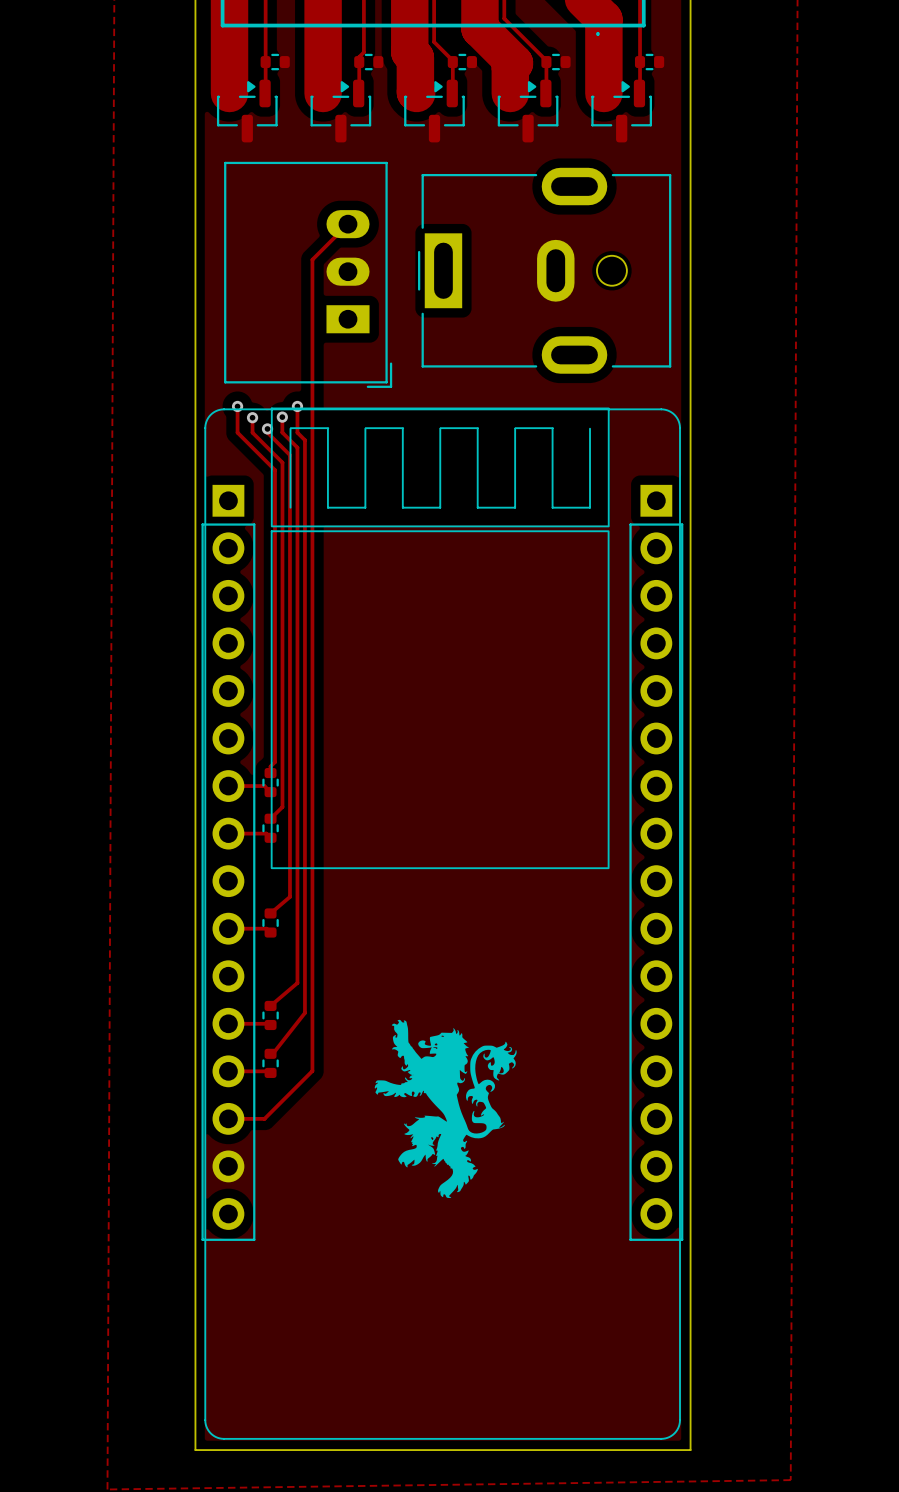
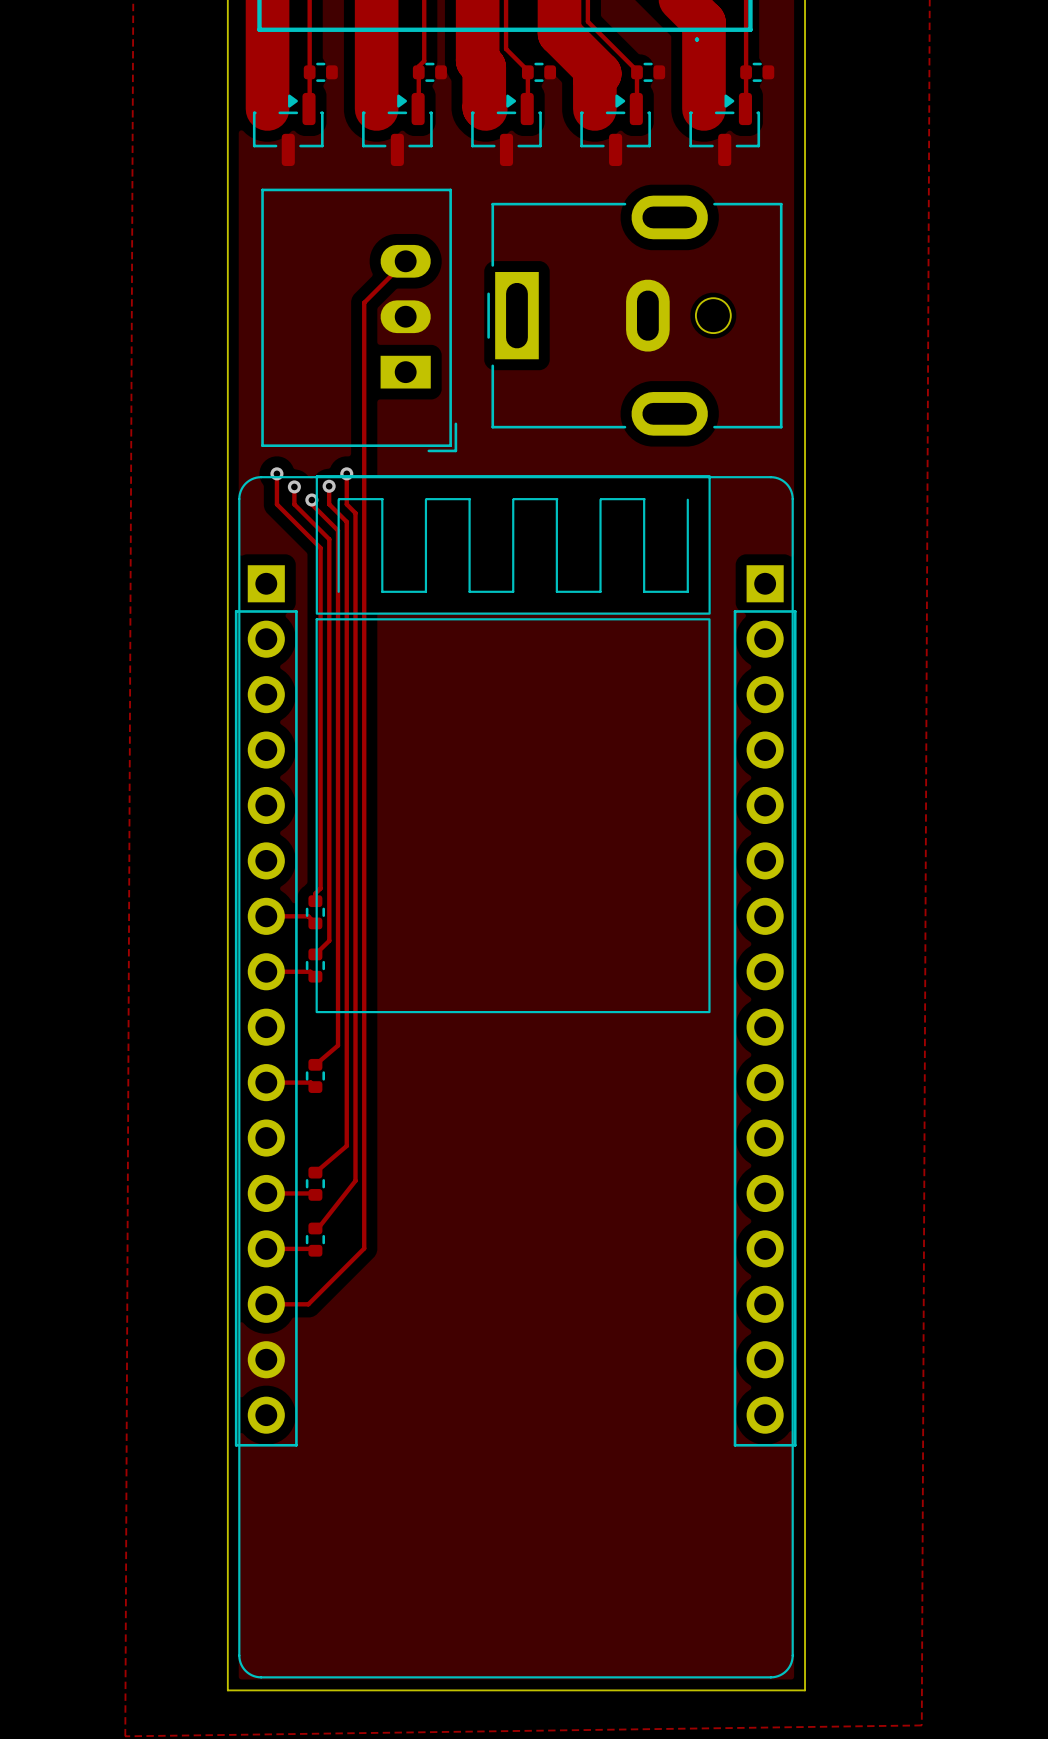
drawing: [374, 1019, 517, 1199] -> none

